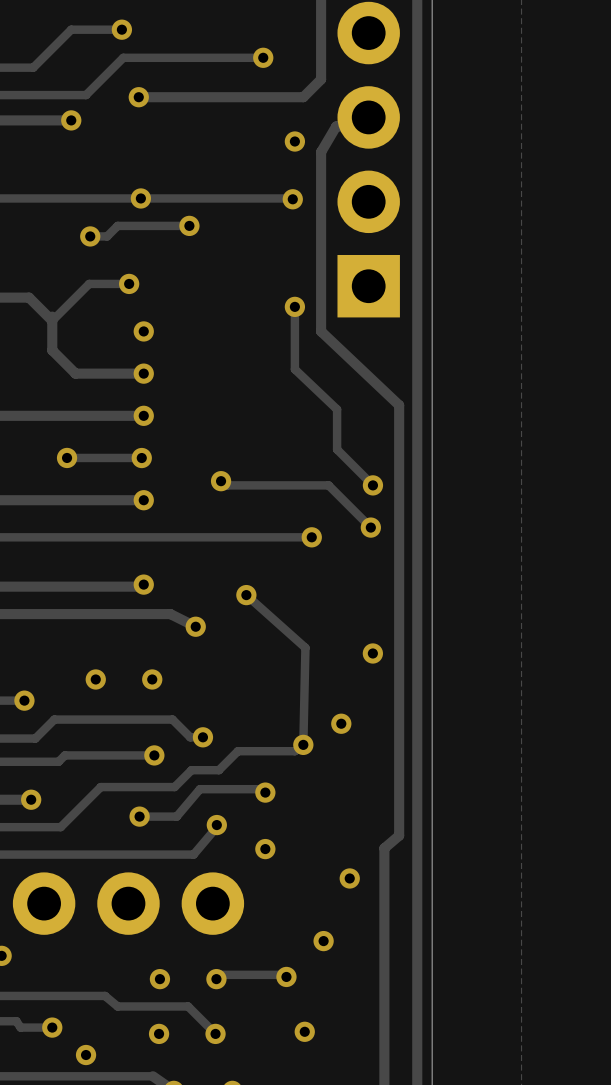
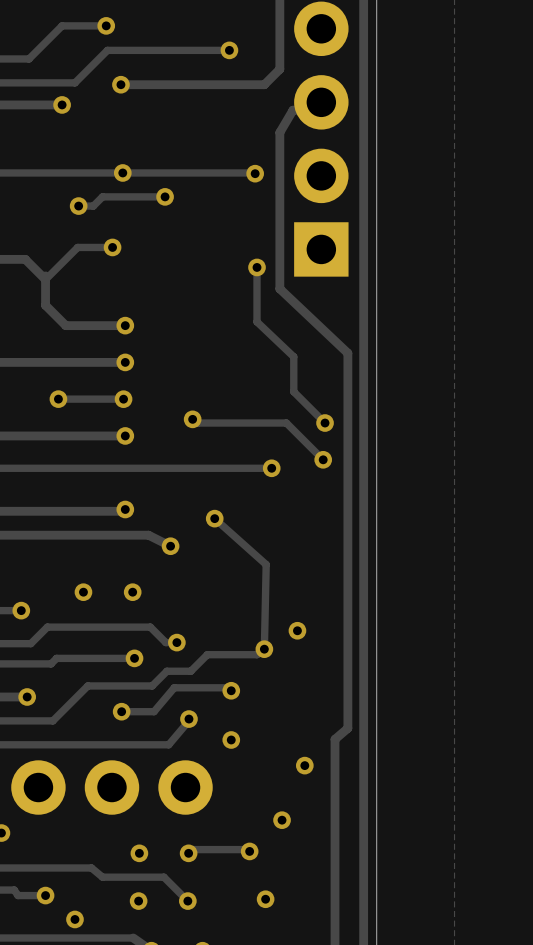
via: (294, 141) -> none
via: (143, 331) -> none
via: (372, 653) -> none

